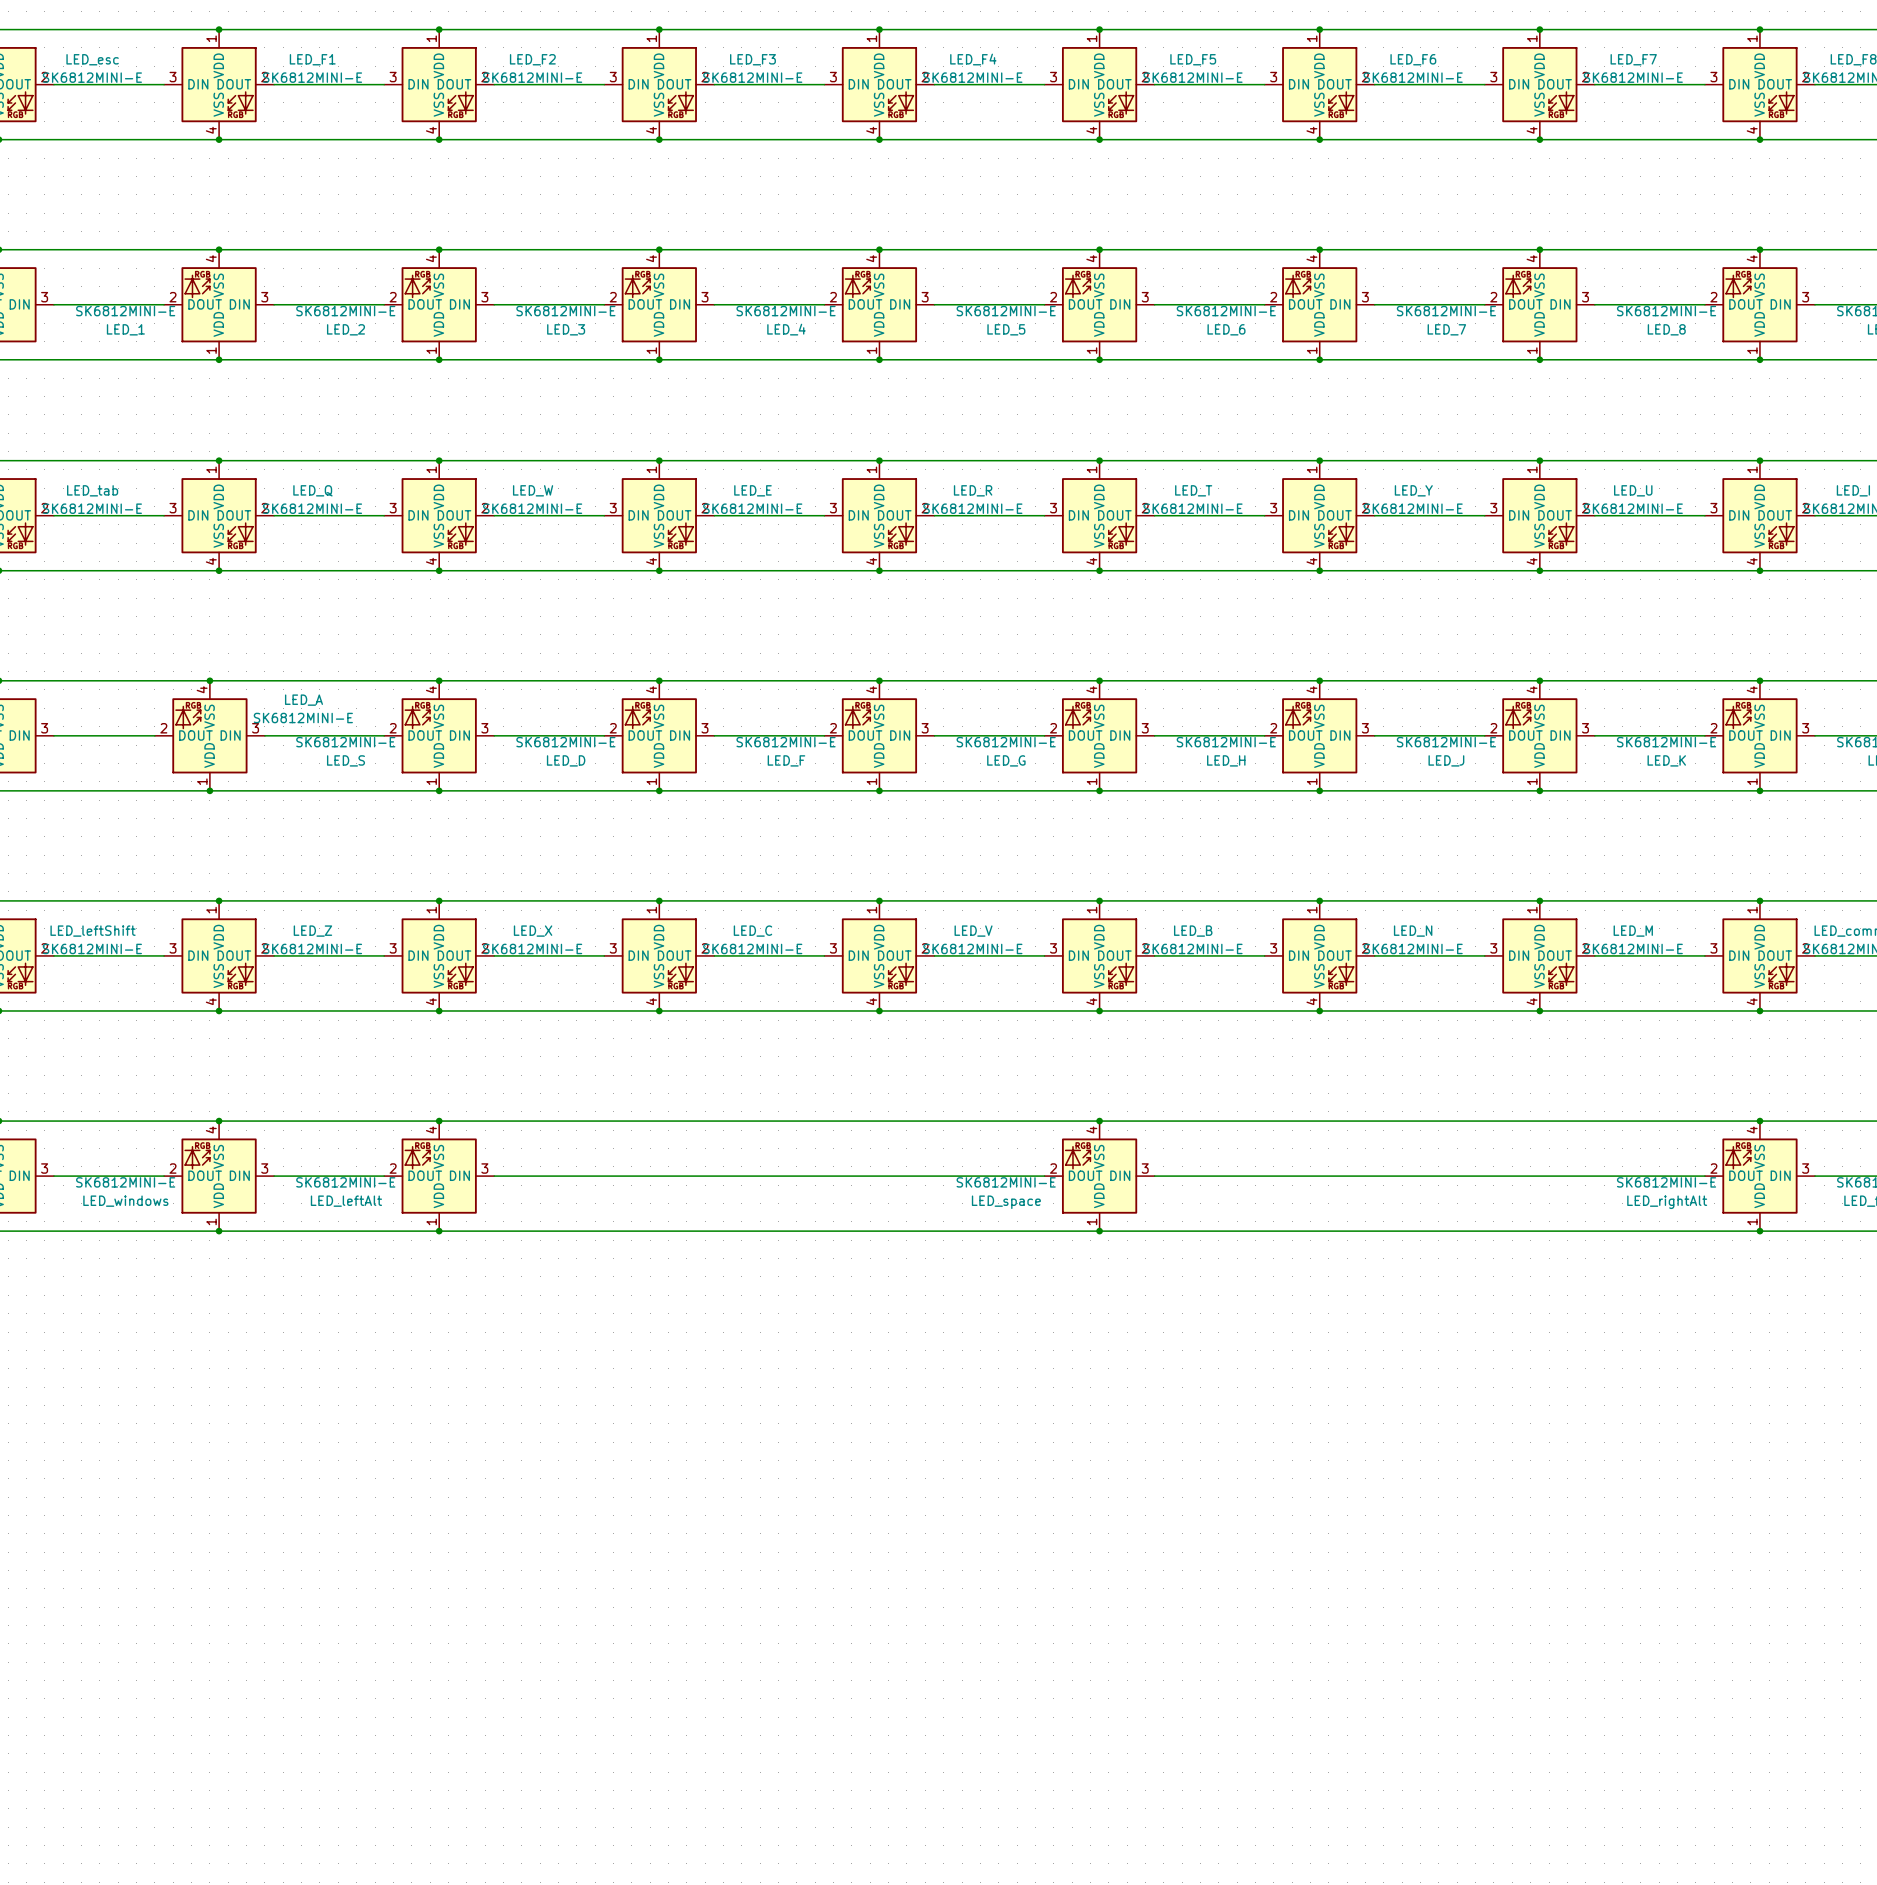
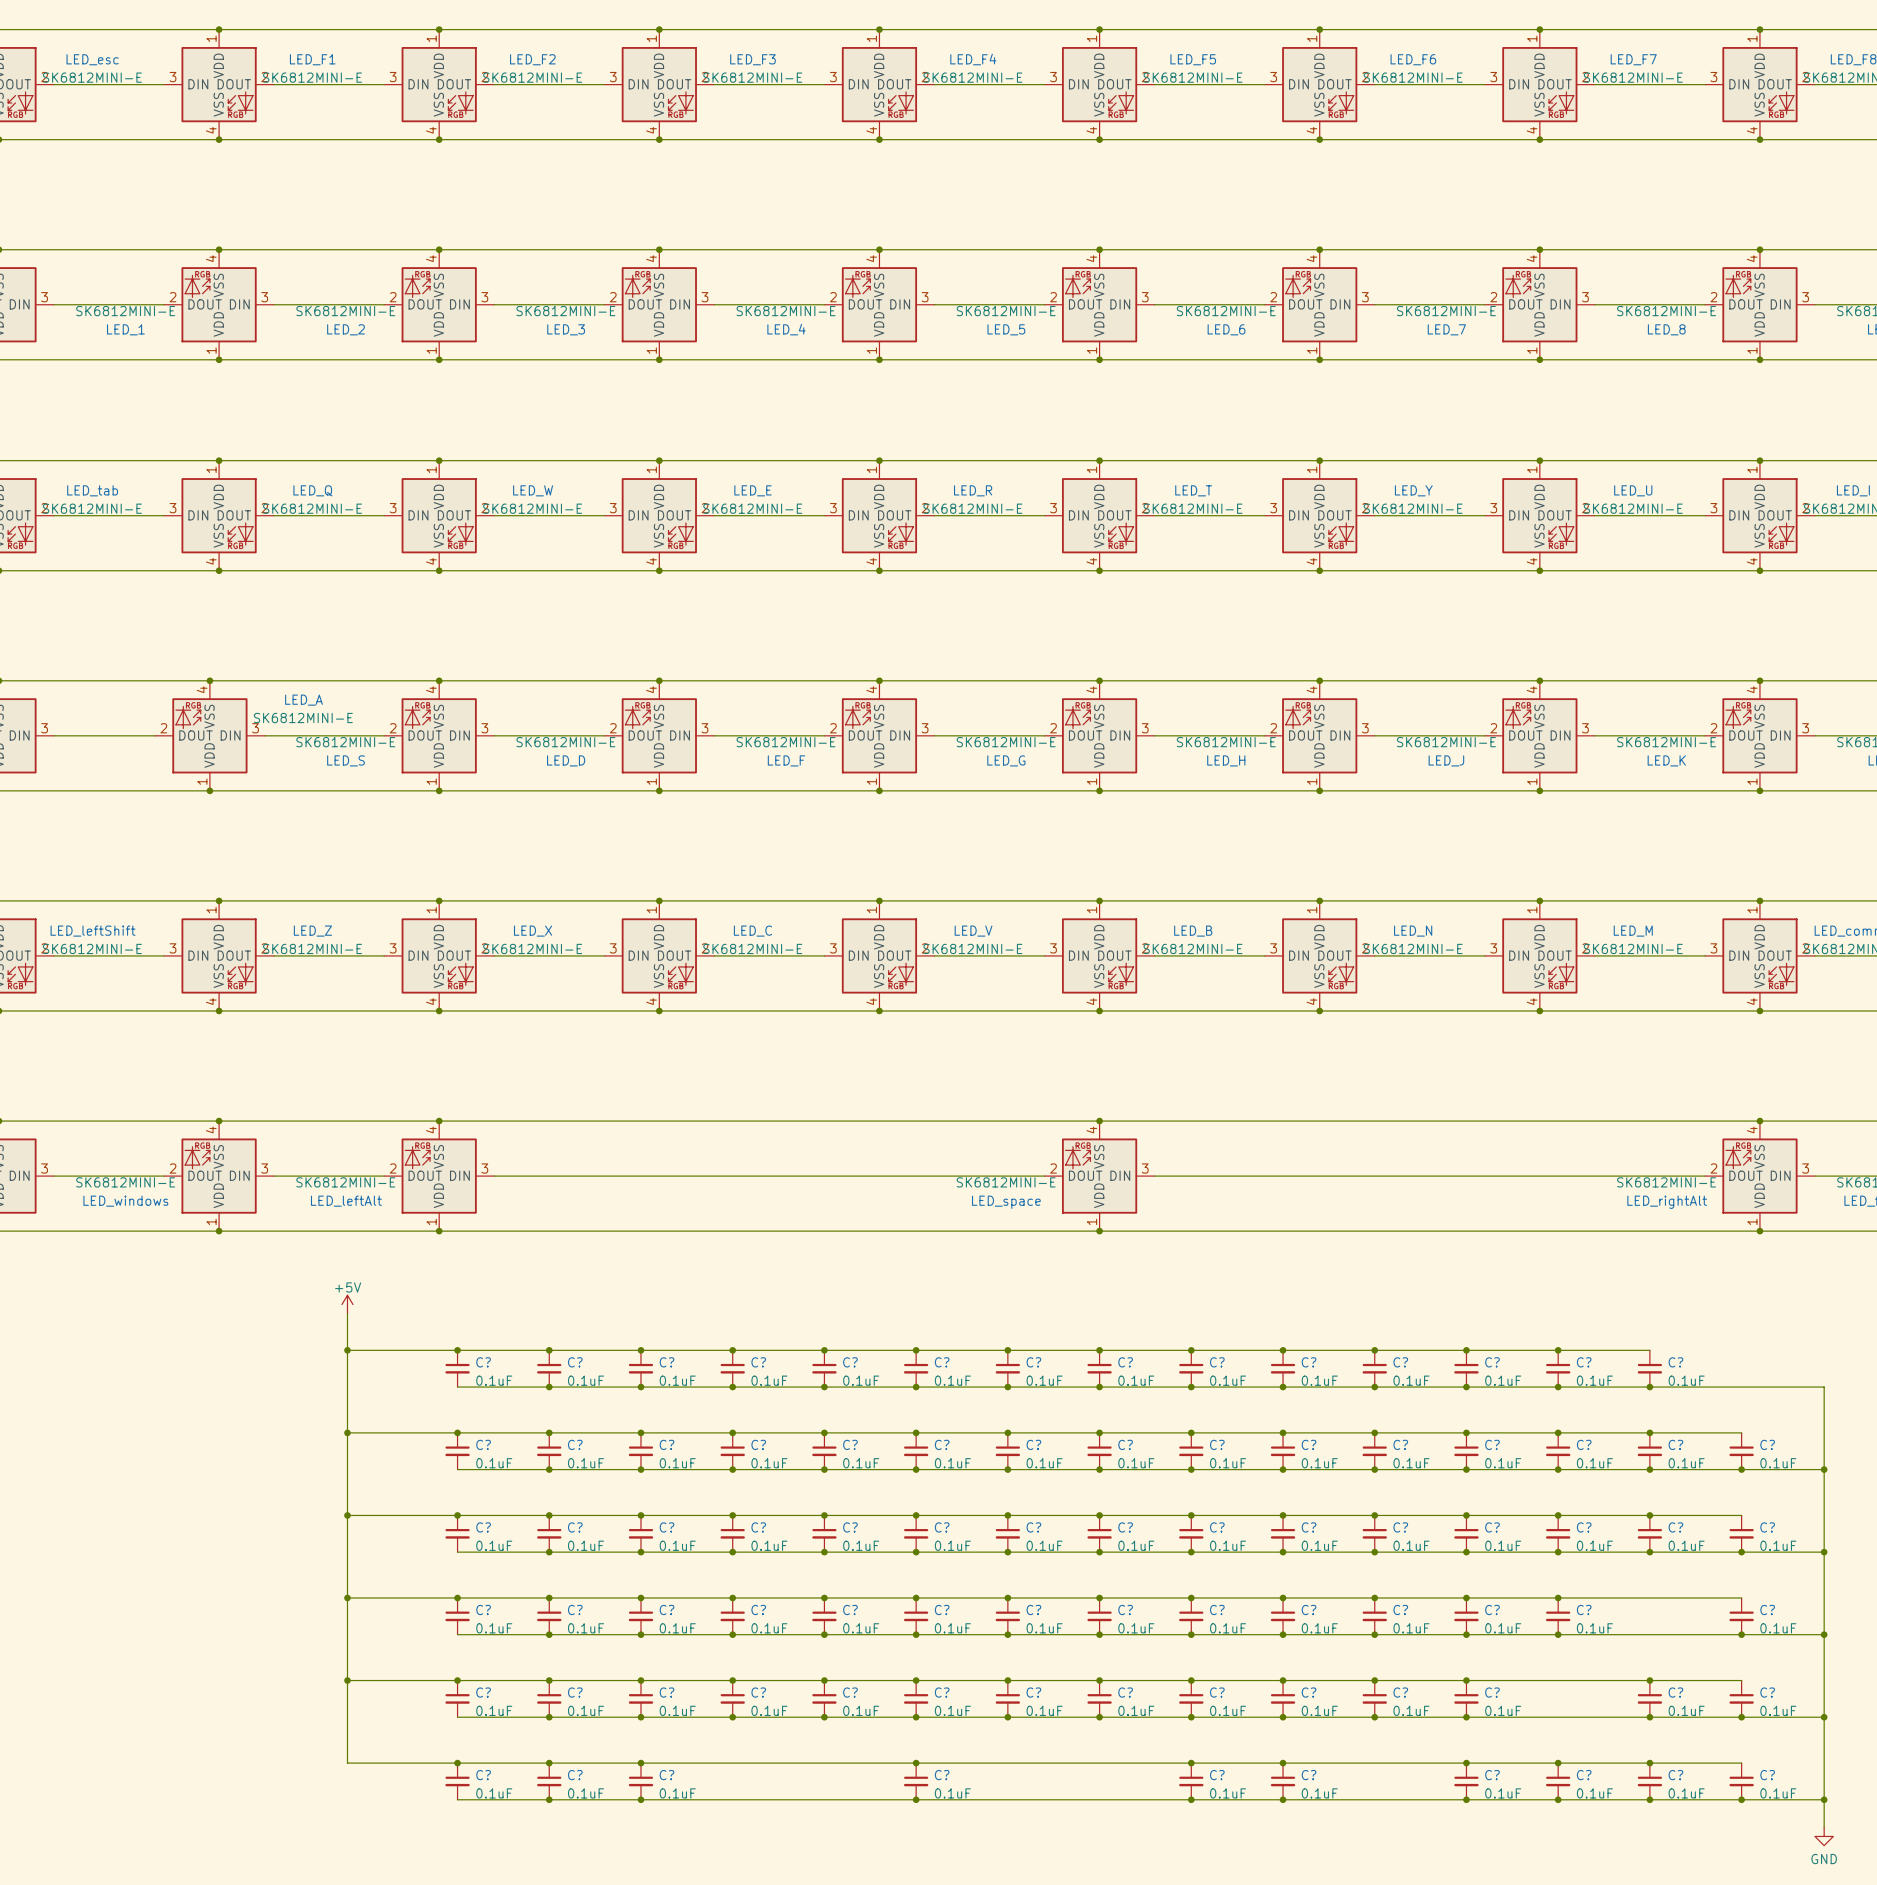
power symbol: none -> +5V (347, 1304)
wire: none -> (347, 1313) (347, 1763) (1741, 1763)
wire: none -> (347, 1350) (1649, 1350)
junction: none -> (347, 1350)
junction: none -> (457, 1350)
junction: none -> (549, 1350)
junction: none -> (640, 1350)
junction: none -> (732, 1350)
junction: none -> (824, 1350)
junction: none -> (916, 1350)
junction: none -> (1007, 1350)
junction: none -> (1099, 1350)
junction: none -> (1191, 1350)
junction: none -> (1283, 1350)
junction: none -> (1374, 1350)
junction: none -> (1466, 1350)
junction: none -> (1558, 1350)
C?: none -> 0.1uF (457, 1368)
C?: none -> 0.1uF (549, 1368)
C?: none -> 0.1uF (640, 1368)
C?: none -> 0.1uF (732, 1368)
C?: none -> 0.1uF (824, 1368)
C?: none -> 0.1uF (916, 1368)
C?: none -> 0.1uF (1007, 1368)
C?: none -> 0.1uF (1099, 1368)
C?: none -> 0.1uF (1191, 1368)
C?: none -> 0.1uF (1283, 1368)
C?: none -> 0.1uF (1374, 1368)
C?: none -> 0.1uF (1466, 1368)
C?: none -> 0.1uF (1558, 1368)
C?: none -> 0.1uF (1649, 1368)
wire: none -> (457, 1387) (1824, 1387) (1824, 1827)
junction: none -> (549, 1387)
junction: none -> (640, 1387)
junction: none -> (732, 1387)
junction: none -> (824, 1387)
junction: none -> (916, 1387)
junction: none -> (1007, 1387)
junction: none -> (1099, 1387)
junction: none -> (1191, 1387)
junction: none -> (1283, 1387)
junction: none -> (1374, 1387)
junction: none -> (1466, 1387)
junction: none -> (1558, 1387)
junction: none -> (1649, 1387)
wire: none -> (347, 1432) (1741, 1432)
junction: none -> (347, 1432)
junction: none -> (457, 1432)
junction: none -> (549, 1432)
junction: none -> (640, 1432)
junction: none -> (732, 1432)
junction: none -> (824, 1432)
junction: none -> (916, 1432)
junction: none -> (1007, 1432)
junction: none -> (1099, 1432)
junction: none -> (1191, 1432)
junction: none -> (1283, 1432)
junction: none -> (1374, 1432)
junction: none -> (1466, 1432)
junction: none -> (1558, 1432)
junction: none -> (1649, 1432)
C?: none -> 0.1uF (457, 1451)
C?: none -> 0.1uF (549, 1451)
C?: none -> 0.1uF (640, 1451)
C?: none -> 0.1uF (732, 1451)
C?: none -> 0.1uF (824, 1451)
C?: none -> 0.1uF (916, 1451)
C?: none -> 0.1uF (1007, 1451)
C?: none -> 0.1uF (1099, 1451)
C?: none -> 0.1uF (1191, 1451)
C?: none -> 0.1uF (1283, 1451)
C?: none -> 0.1uF (1374, 1451)
C?: none -> 0.1uF (1466, 1451)
C?: none -> 0.1uF (1558, 1451)
C?: none -> 0.1uF (1649, 1451)
C?: none -> 0.1uF (1741, 1451)
wire: none -> (457, 1469) (1824, 1469)
junction: none -> (549, 1469)
junction: none -> (640, 1469)
junction: none -> (732, 1469)
junction: none -> (824, 1469)
junction: none -> (916, 1469)
junction: none -> (1007, 1469)
junction: none -> (1099, 1469)
junction: none -> (1191, 1469)
junction: none -> (1283, 1469)
junction: none -> (1374, 1469)
junction: none -> (1466, 1469)
junction: none -> (1558, 1469)
junction: none -> (1649, 1469)
junction: none -> (1741, 1469)
junction: none -> (1824, 1469)
wire: none -> (347, 1515) (1741, 1515)
junction: none -> (347, 1515)
junction: none -> (457, 1515)
junction: none -> (549, 1515)
junction: none -> (640, 1515)
junction: none -> (732, 1515)
junction: none -> (824, 1515)
junction: none -> (916, 1515)
junction: none -> (1007, 1515)
junction: none -> (1099, 1515)
junction: none -> (1191, 1515)
junction: none -> (1283, 1515)
junction: none -> (1374, 1515)
junction: none -> (1466, 1515)
junction: none -> (1558, 1515)
junction: none -> (1649, 1515)
C?: none -> 0.1uF (457, 1533)
C?: none -> 0.1uF (549, 1533)
C?: none -> 0.1uF (640, 1533)
C?: none -> 0.1uF (732, 1533)
C?: none -> 0.1uF (824, 1533)
C?: none -> 0.1uF (916, 1533)
C?: none -> 0.1uF (1007, 1533)
C?: none -> 0.1uF (1099, 1533)
C?: none -> 0.1uF (1191, 1533)
C?: none -> 0.1uF (1283, 1533)
C?: none -> 0.1uF (1374, 1533)
C?: none -> 0.1uF (1466, 1533)
C?: none -> 0.1uF (1558, 1533)
C?: none -> 0.1uF (1649, 1533)
C?: none -> 0.1uF (1741, 1533)
wire: none -> (457, 1552) (1824, 1552)
junction: none -> (549, 1552)
junction: none -> (640, 1552)
junction: none -> (732, 1552)
junction: none -> (824, 1552)
junction: none -> (916, 1552)
junction: none -> (1007, 1552)
junction: none -> (1099, 1552)
junction: none -> (1191, 1552)
junction: none -> (1283, 1552)
junction: none -> (1374, 1552)
junction: none -> (1466, 1552)
junction: none -> (1558, 1552)
junction: none -> (1649, 1552)
junction: none -> (1741, 1552)
junction: none -> (1824, 1552)
wire: none -> (347, 1597) (1741, 1597)
junction: none -> (347, 1597)
junction: none -> (457, 1597)
junction: none -> (549, 1597)
junction: none -> (640, 1597)
junction: none -> (732, 1597)
junction: none -> (824, 1597)
junction: none -> (916, 1597)
junction: none -> (1007, 1597)
junction: none -> (1099, 1597)
junction: none -> (1191, 1597)
junction: none -> (1283, 1597)
junction: none -> (1374, 1597)
junction: none -> (1466, 1597)
junction: none -> (1558, 1597)
C?: none -> 0.1uF (457, 1616)
C?: none -> 0.1uF (549, 1616)
C?: none -> 0.1uF (640, 1616)
C?: none -> 0.1uF (732, 1616)
C?: none -> 0.1uF (824, 1616)
C?: none -> 0.1uF (916, 1616)
C?: none -> 0.1uF (1007, 1616)
C?: none -> 0.1uF (1099, 1616)
C?: none -> 0.1uF (1191, 1616)
C?: none -> 0.1uF (1283, 1616)
C?: none -> 0.1uF (1374, 1616)
C?: none -> 0.1uF (1466, 1616)
C?: none -> 0.1uF (1558, 1616)
C?: none -> 0.1uF (1741, 1616)
wire: none -> (457, 1634) (1824, 1634)
junction: none -> (549, 1634)
junction: none -> (640, 1634)
junction: none -> (732, 1634)
junction: none -> (824, 1634)
junction: none -> (916, 1634)
junction: none -> (1007, 1634)
junction: none -> (1099, 1634)
junction: none -> (1191, 1634)
junction: none -> (1283, 1634)
junction: none -> (1374, 1634)
junction: none -> (1466, 1634)
junction: none -> (1558, 1634)
junction: none -> (1741, 1634)
junction: none -> (1824, 1634)
wire: none -> (347, 1680) (1741, 1680)
junction: none -> (347, 1680)
junction: none -> (457, 1680)
junction: none -> (549, 1680)
junction: none -> (640, 1680)
junction: none -> (732, 1680)
junction: none -> (824, 1680)
junction: none -> (916, 1680)
junction: none -> (1007, 1680)
junction: none -> (1099, 1680)
junction: none -> (1191, 1680)
junction: none -> (1283, 1680)
junction: none -> (1374, 1680)
junction: none -> (1466, 1680)
junction: none -> (1649, 1680)
C?: none -> 0.1uF (457, 1698)
C?: none -> 0.1uF (549, 1698)
C?: none -> 0.1uF (640, 1698)
C?: none -> 0.1uF (732, 1698)
C?: none -> 0.1uF (824, 1698)
C?: none -> 0.1uF (916, 1698)
C?: none -> 0.1uF (1007, 1698)
C?: none -> 0.1uF (1099, 1698)
C?: none -> 0.1uF (1191, 1698)
C?: none -> 0.1uF (1283, 1698)
C?: none -> 0.1uF (1374, 1698)
C?: none -> 0.1uF (1466, 1698)
C?: none -> 0.1uF (1649, 1698)
C?: none -> 0.1uF (1741, 1698)
wire: none -> (457, 1717) (1824, 1717)
junction: none -> (549, 1717)
junction: none -> (640, 1717)
junction: none -> (732, 1717)
junction: none -> (824, 1717)
junction: none -> (916, 1717)
junction: none -> (1007, 1717)
junction: none -> (1099, 1717)
junction: none -> (1191, 1717)
junction: none -> (1283, 1717)
junction: none -> (1374, 1717)
junction: none -> (1466, 1717)
junction: none -> (1649, 1717)
junction: none -> (1741, 1717)
junction: none -> (1824, 1717)
junction: none -> (457, 1763)
junction: none -> (549, 1763)
junction: none -> (640, 1763)
junction: none -> (916, 1763)
junction: none -> (1191, 1763)
junction: none -> (1283, 1763)
junction: none -> (1466, 1763)
junction: none -> (1558, 1763)
junction: none -> (1649, 1763)
C?: none -> 0.1uF (457, 1781)
C?: none -> 0.1uF (549, 1781)
C?: none -> 0.1uF (640, 1781)
C?: none -> 0.1uF (916, 1781)
C?: none -> 0.1uF (1191, 1781)
C?: none -> 0.1uF (1283, 1781)
C?: none -> 0.1uF (1466, 1781)
C?: none -> 0.1uF (1558, 1781)
C?: none -> 0.1uF (1649, 1781)
C?: none -> 0.1uF (1741, 1781)
wire: none -> (457, 1799) (1824, 1799)
junction: none -> (549, 1799)
junction: none -> (640, 1799)
junction: none -> (916, 1799)
junction: none -> (1191, 1799)
junction: none -> (1283, 1799)
junction: none -> (1466, 1799)
junction: none -> (1558, 1799)
junction: none -> (1649, 1799)
junction: none -> (1741, 1799)
junction: none -> (1824, 1799)
power symbol: none -> GND (1824, 1836)

